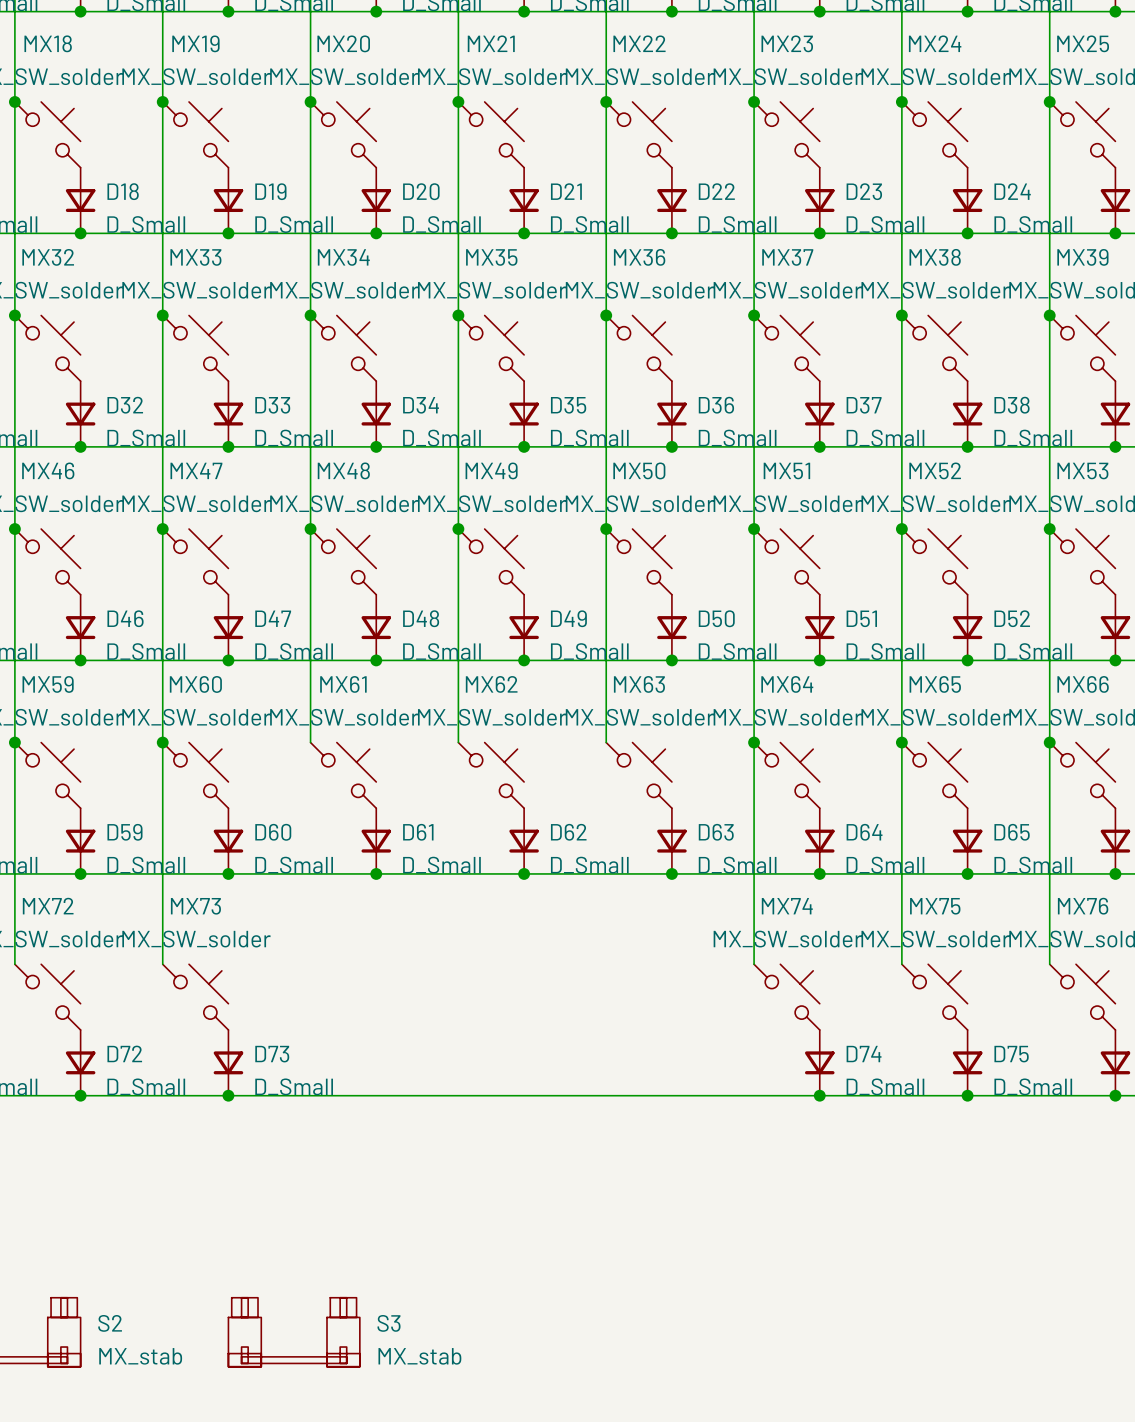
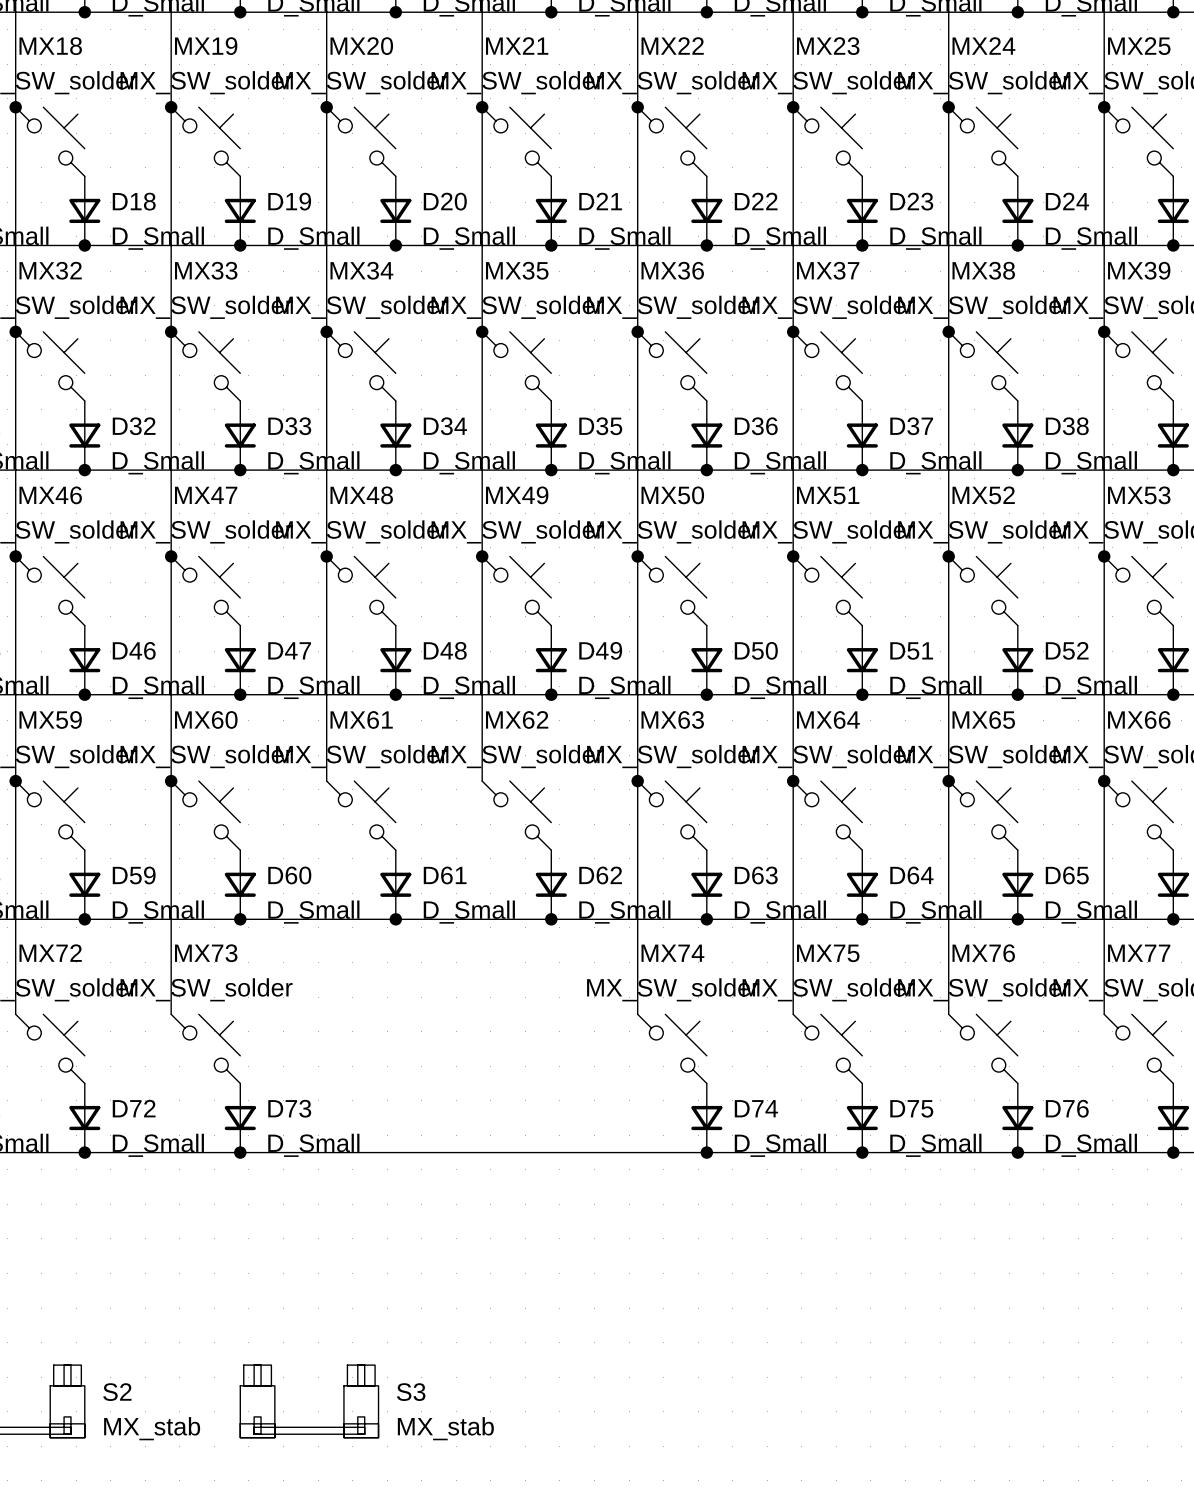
wire: none -> (637, 781) (637, 1014)
junction: none -> (637, 781)
MX74 name: MX74 (787, 906) -> MX75 (828, 953)
MX75 name: MX75 (935, 906) -> MX76 (983, 953)
MX76 name: MX76 (1083, 906) -> MX77 (1139, 953)
MX74: none -> MX_SW_solder (672, 1048)
D74 name: D74 (864, 1054) -> D75 (911, 1108)
D75 name: D75 (1011, 1054) -> D76 (1067, 1108)
D74: none -> D_Small (706, 1118)
junction: none -> (706, 1152)

